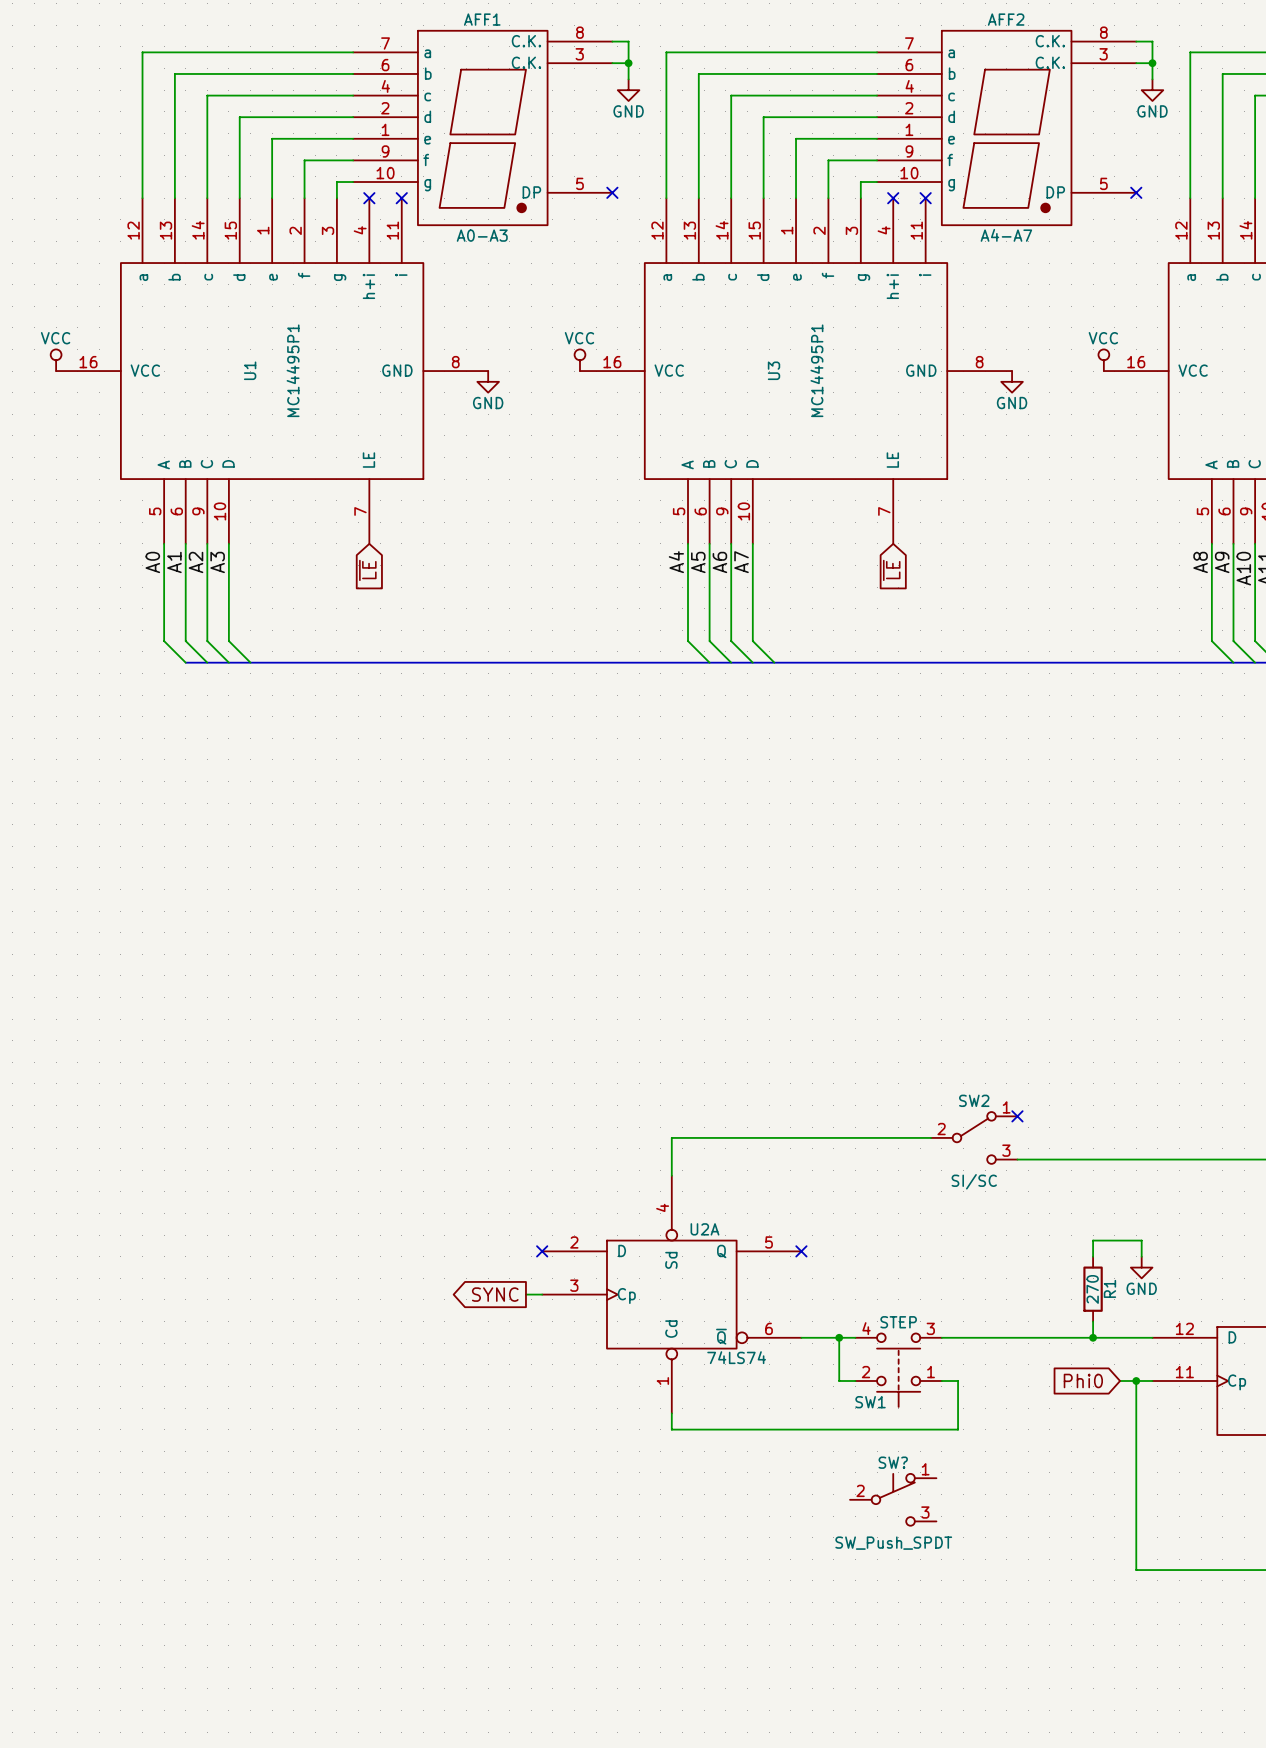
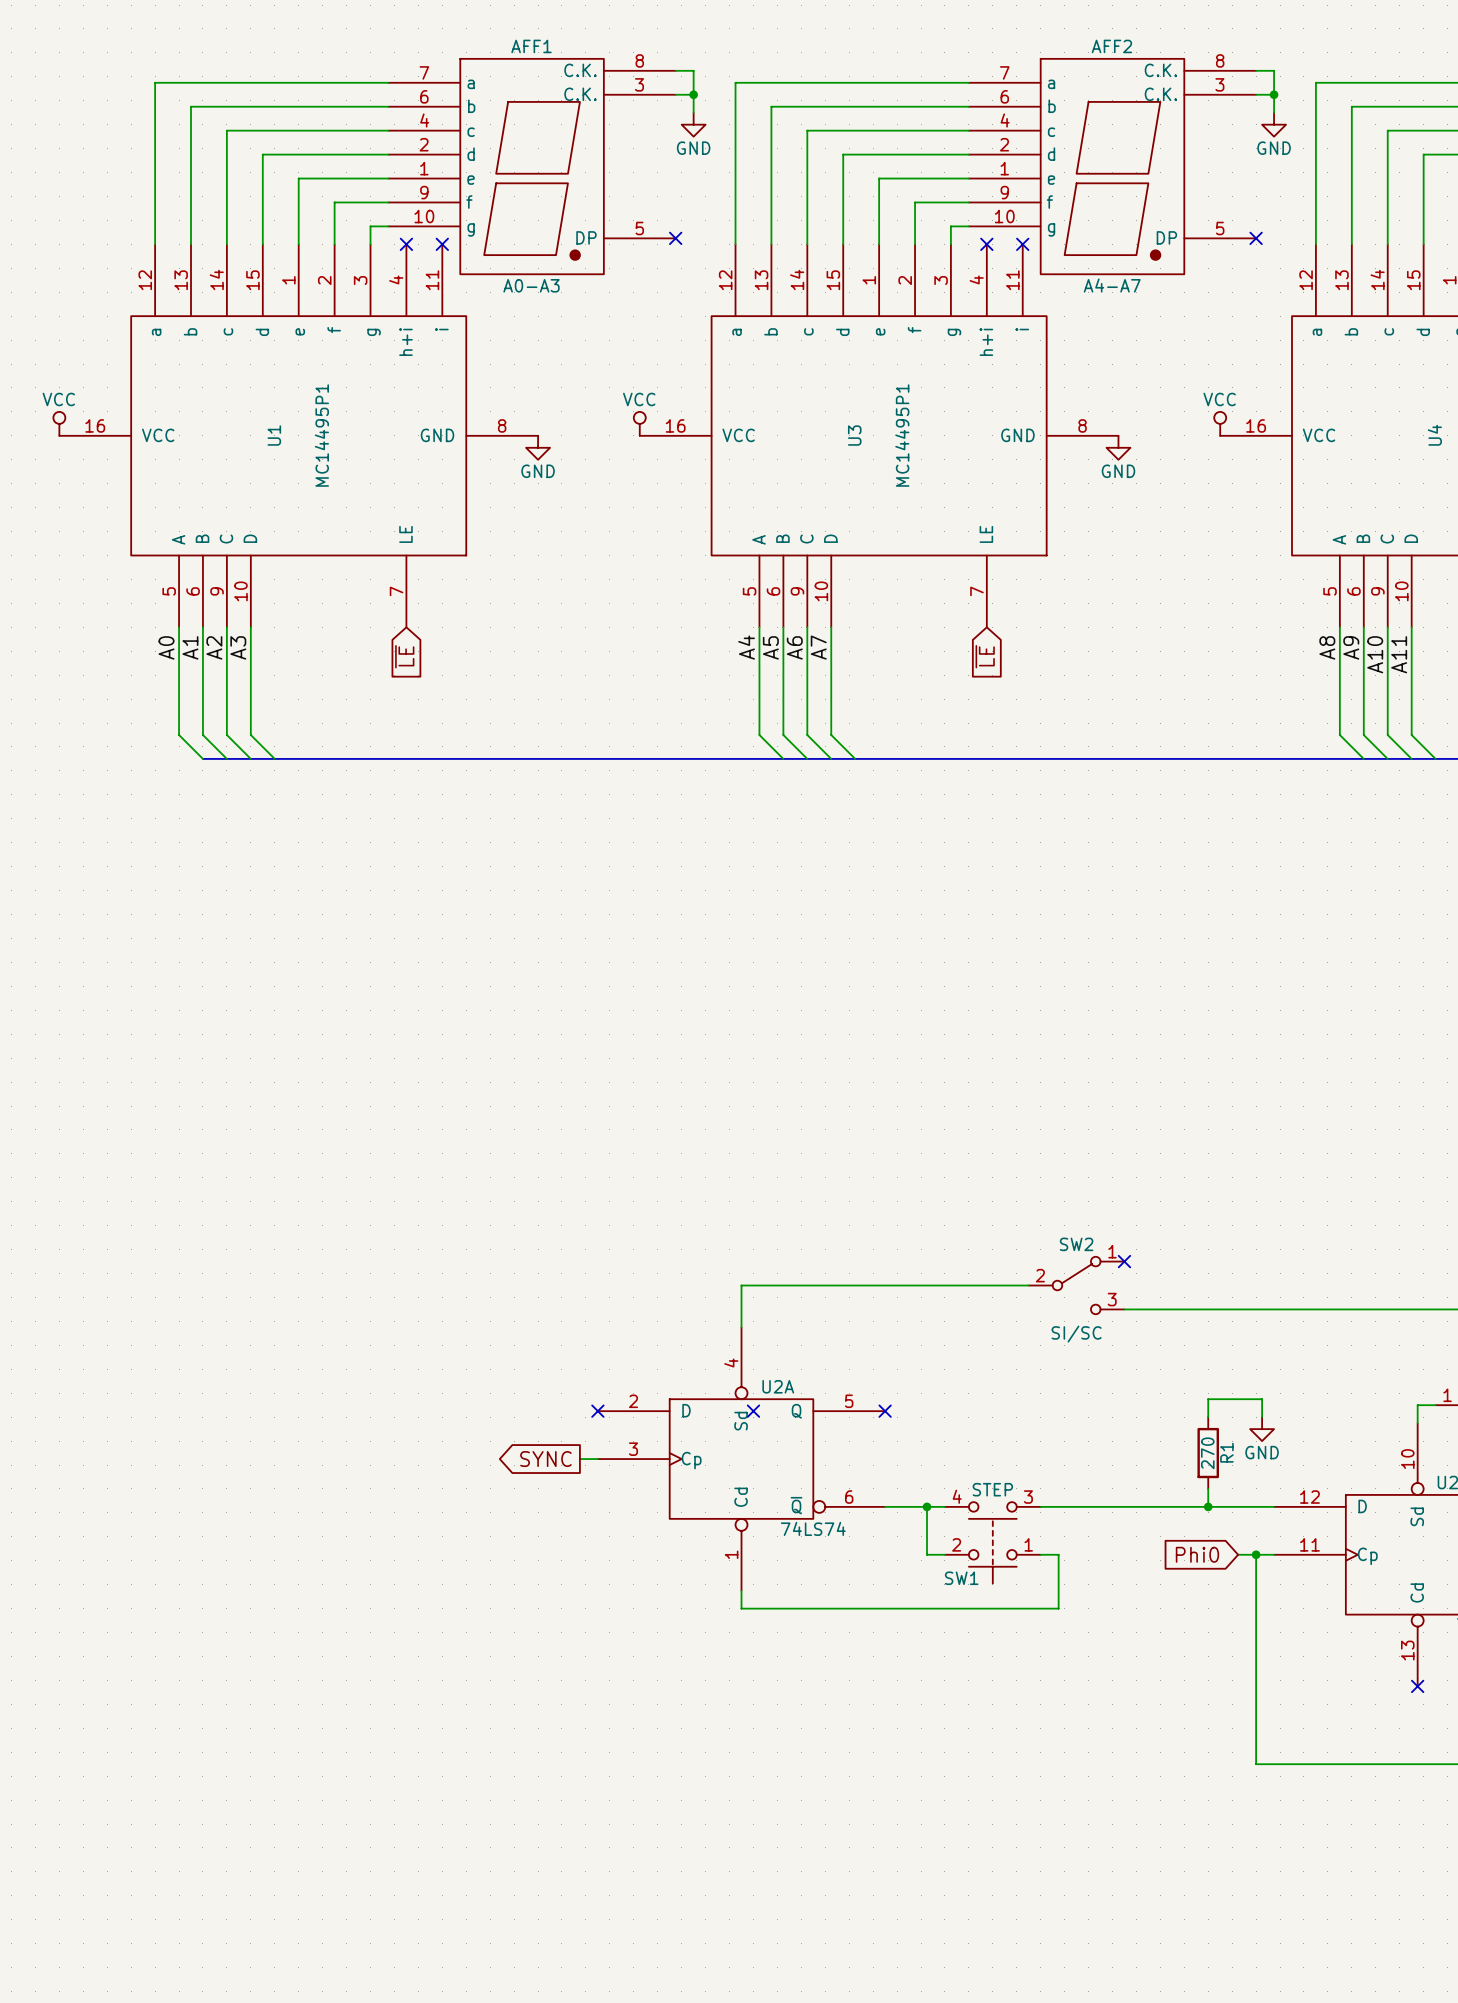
no-connect mark: none -> (753, 1411)
SW?: SW_Push_SPDT (893, 1499) -> none

